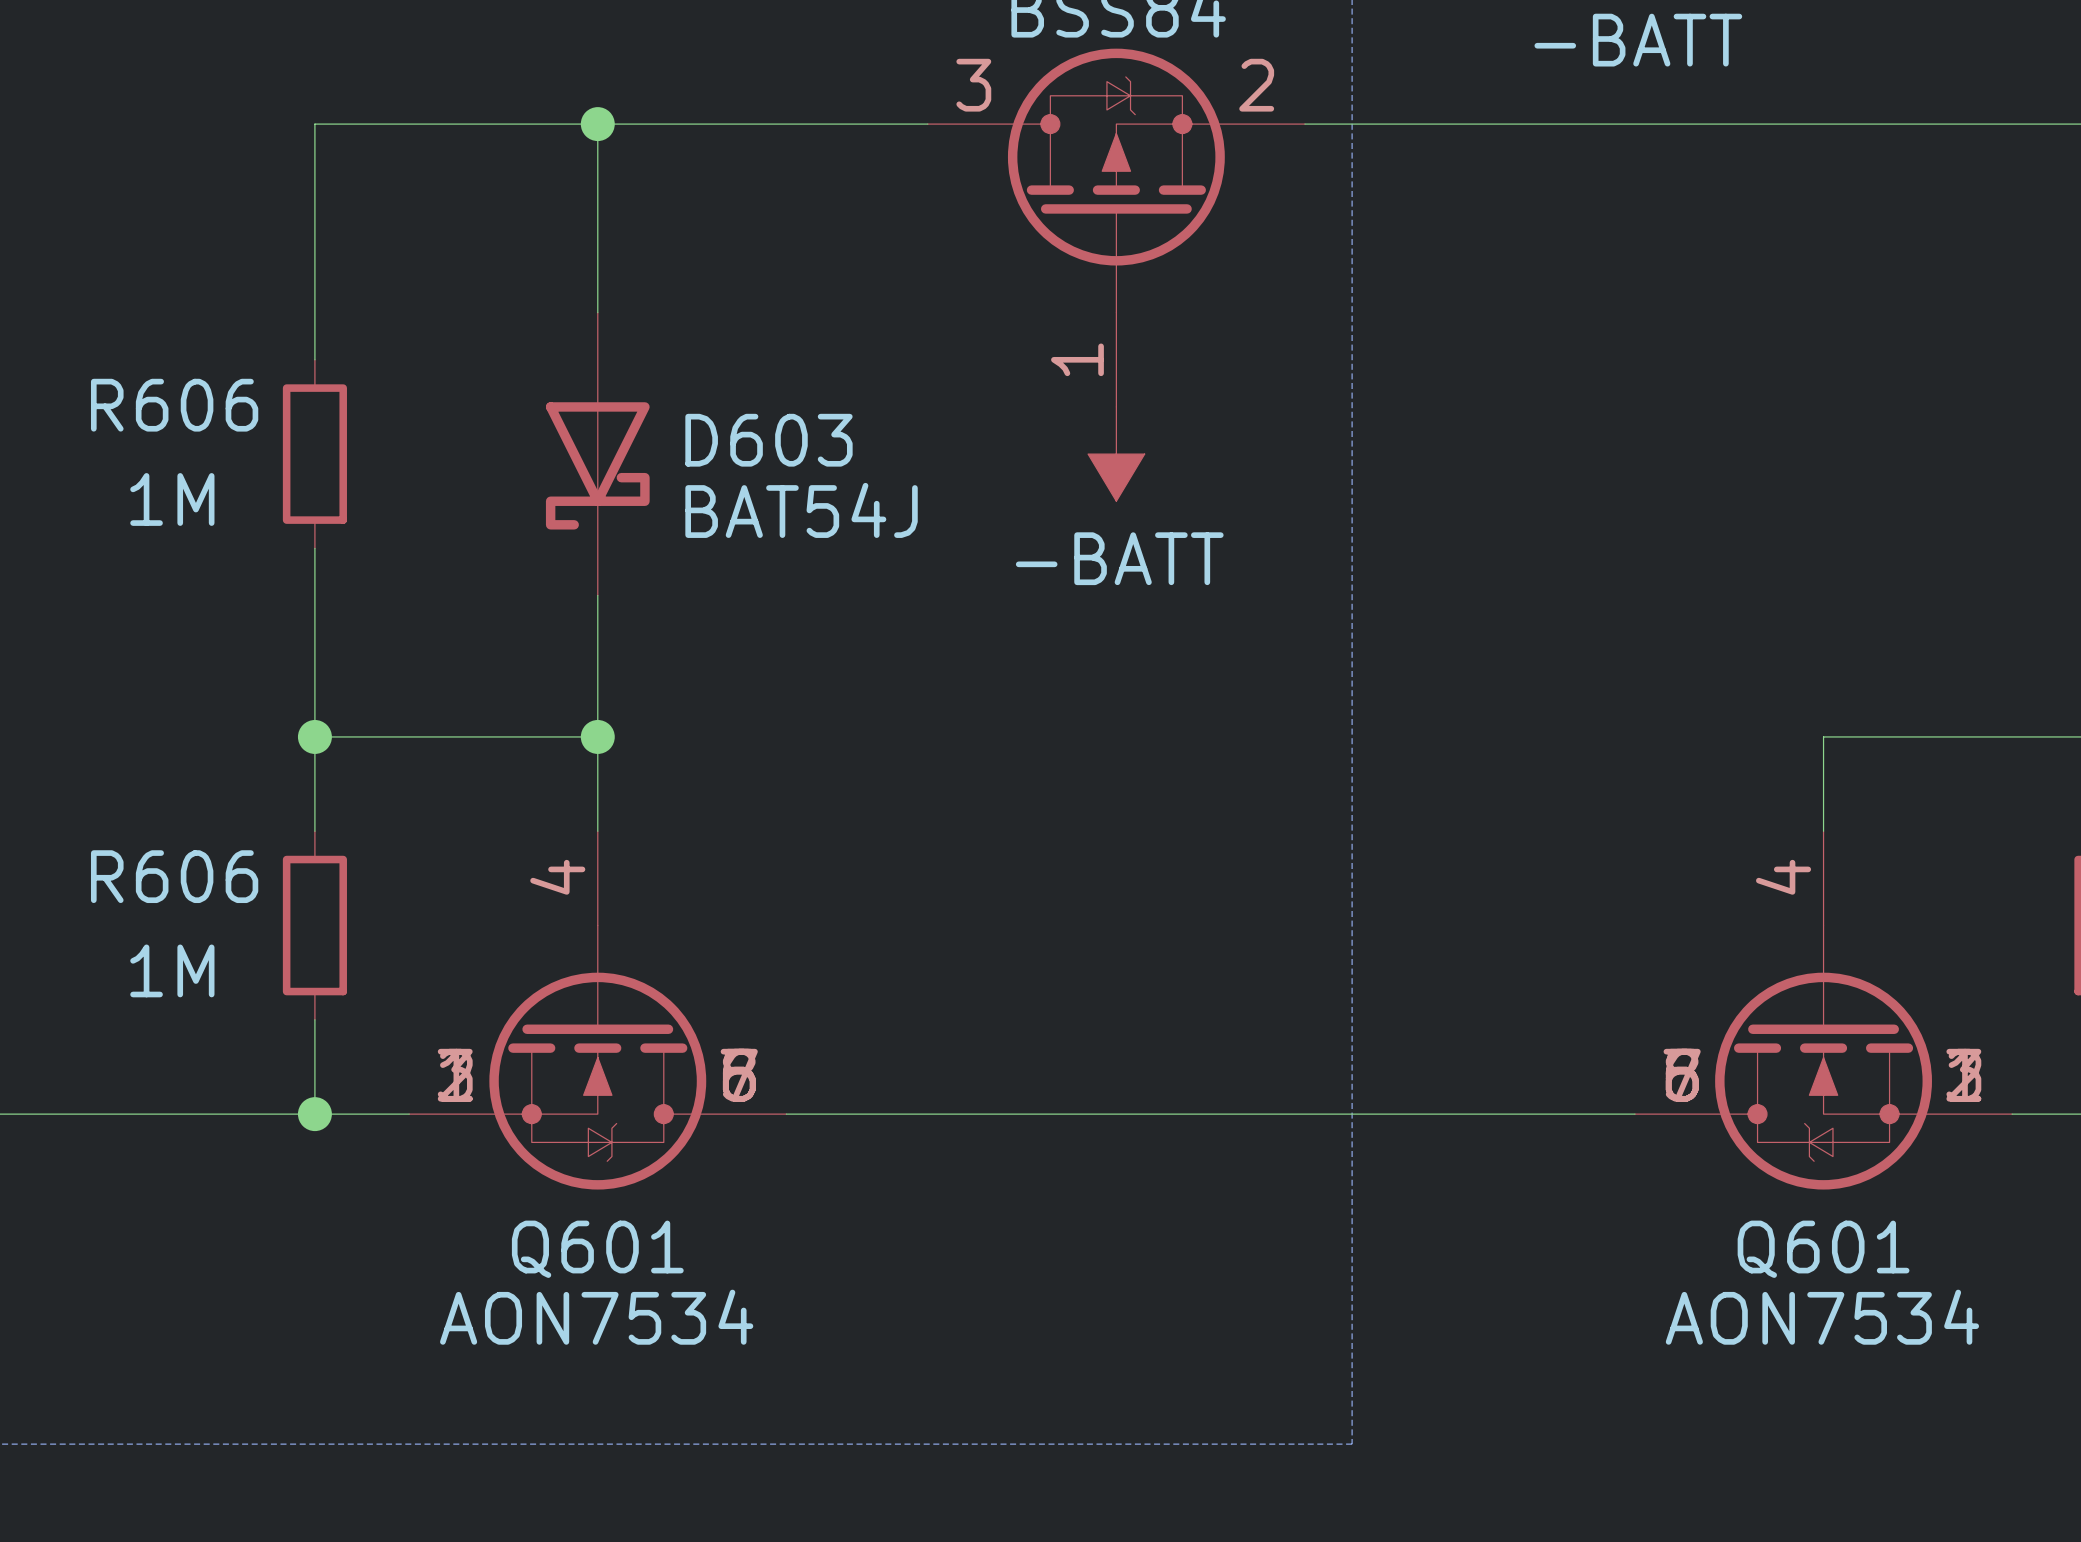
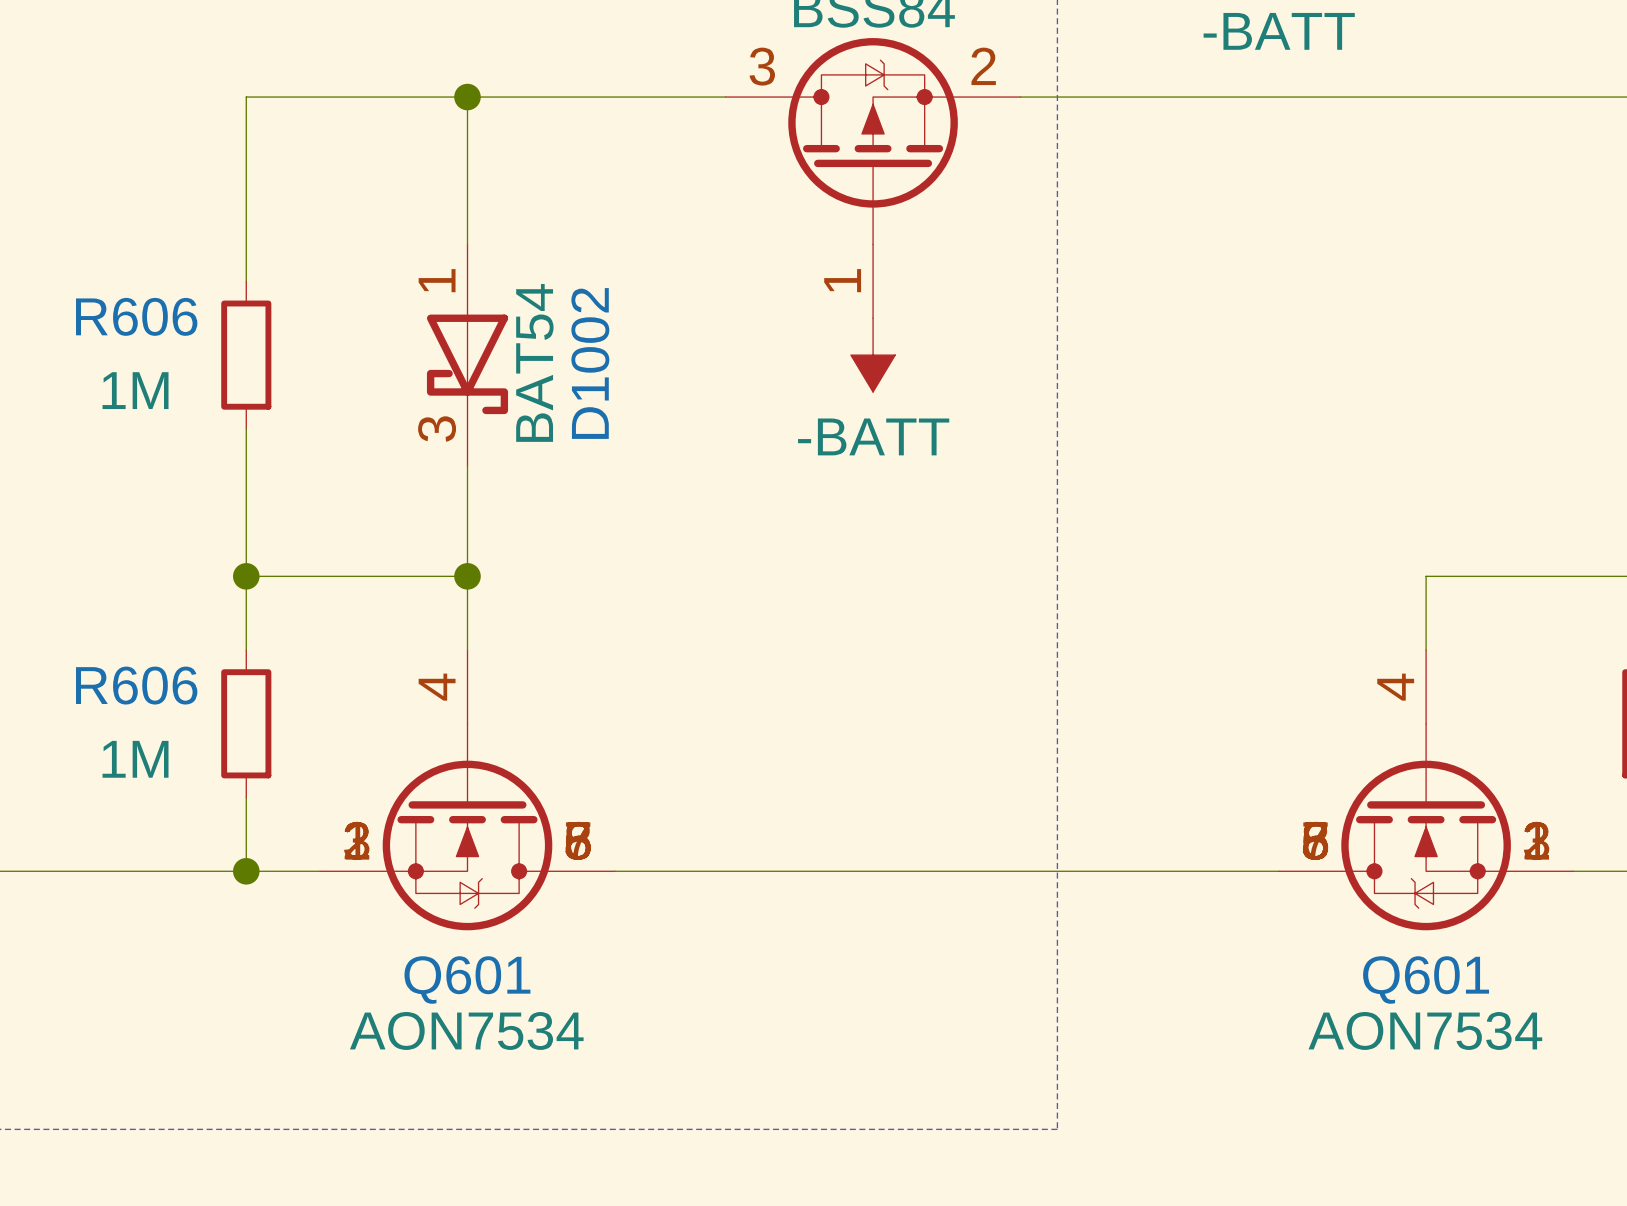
D603: BAT54J (597, 454) -> none
D1002: none -> BAT54 (467, 355)

